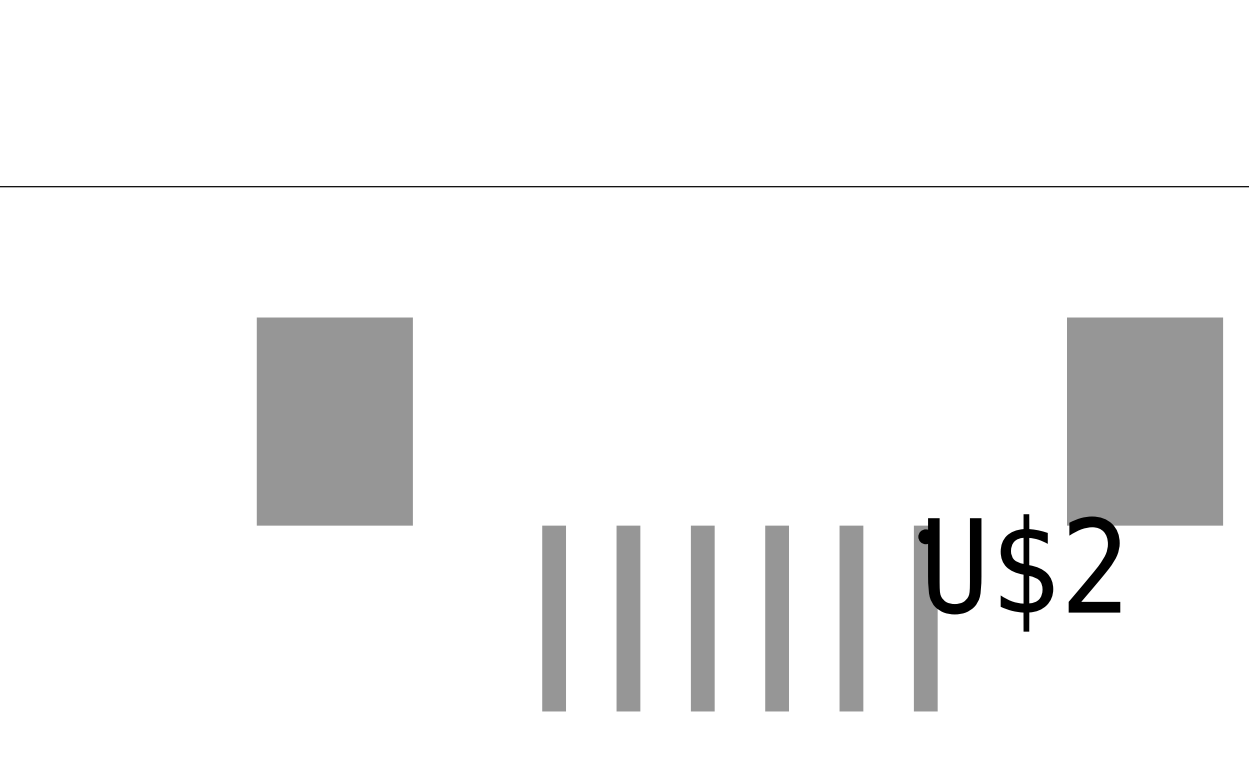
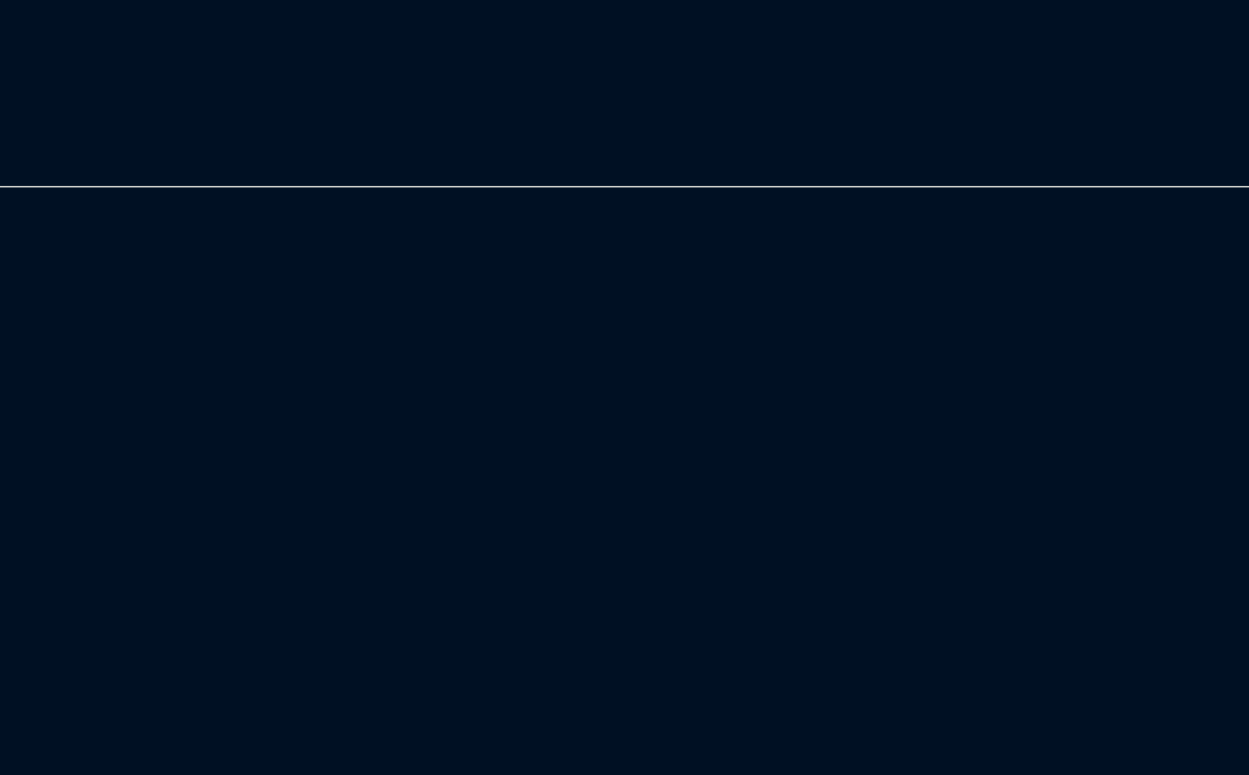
U$2: (739, 514) -> none

